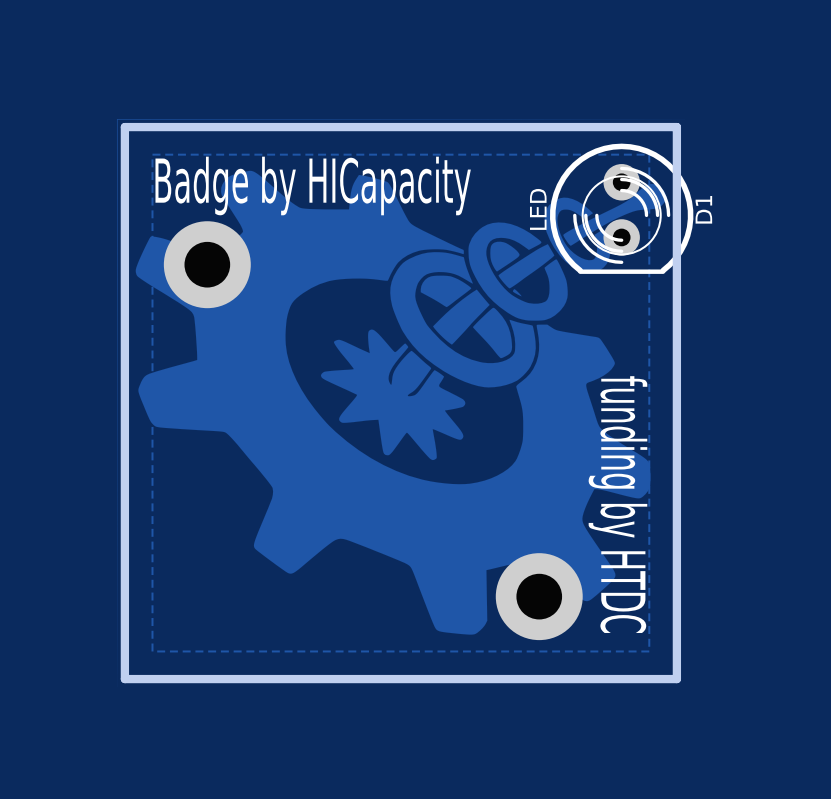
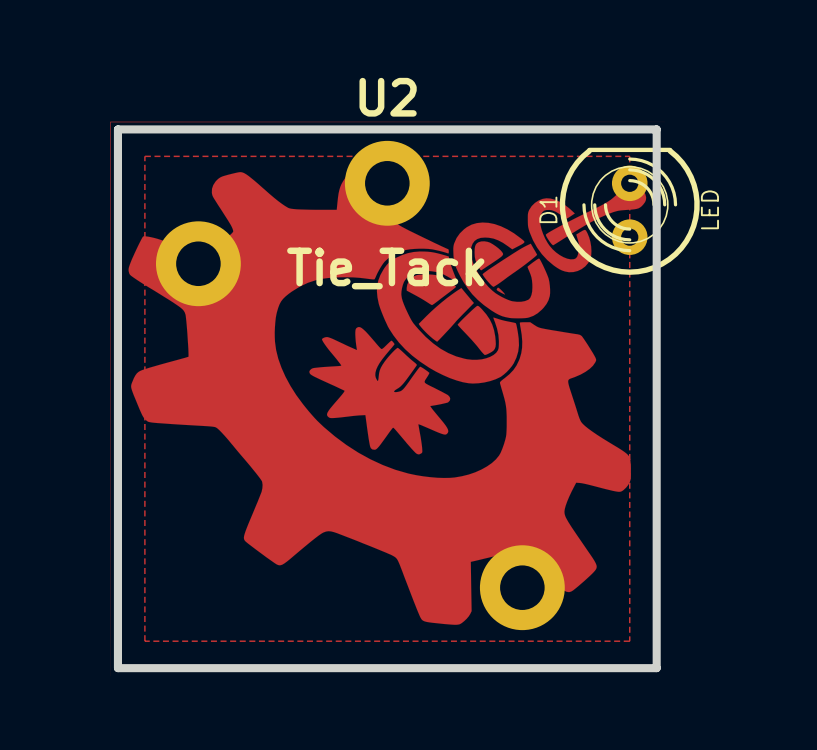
U2: none -> Tie_Tack (387, 183)
text: Badge by HICapacity (313, 185) -> none
D1 rotation: 0° (621, 208) -> 180° (629, 211)
text: funding by HTDC (617, 504) -> none

